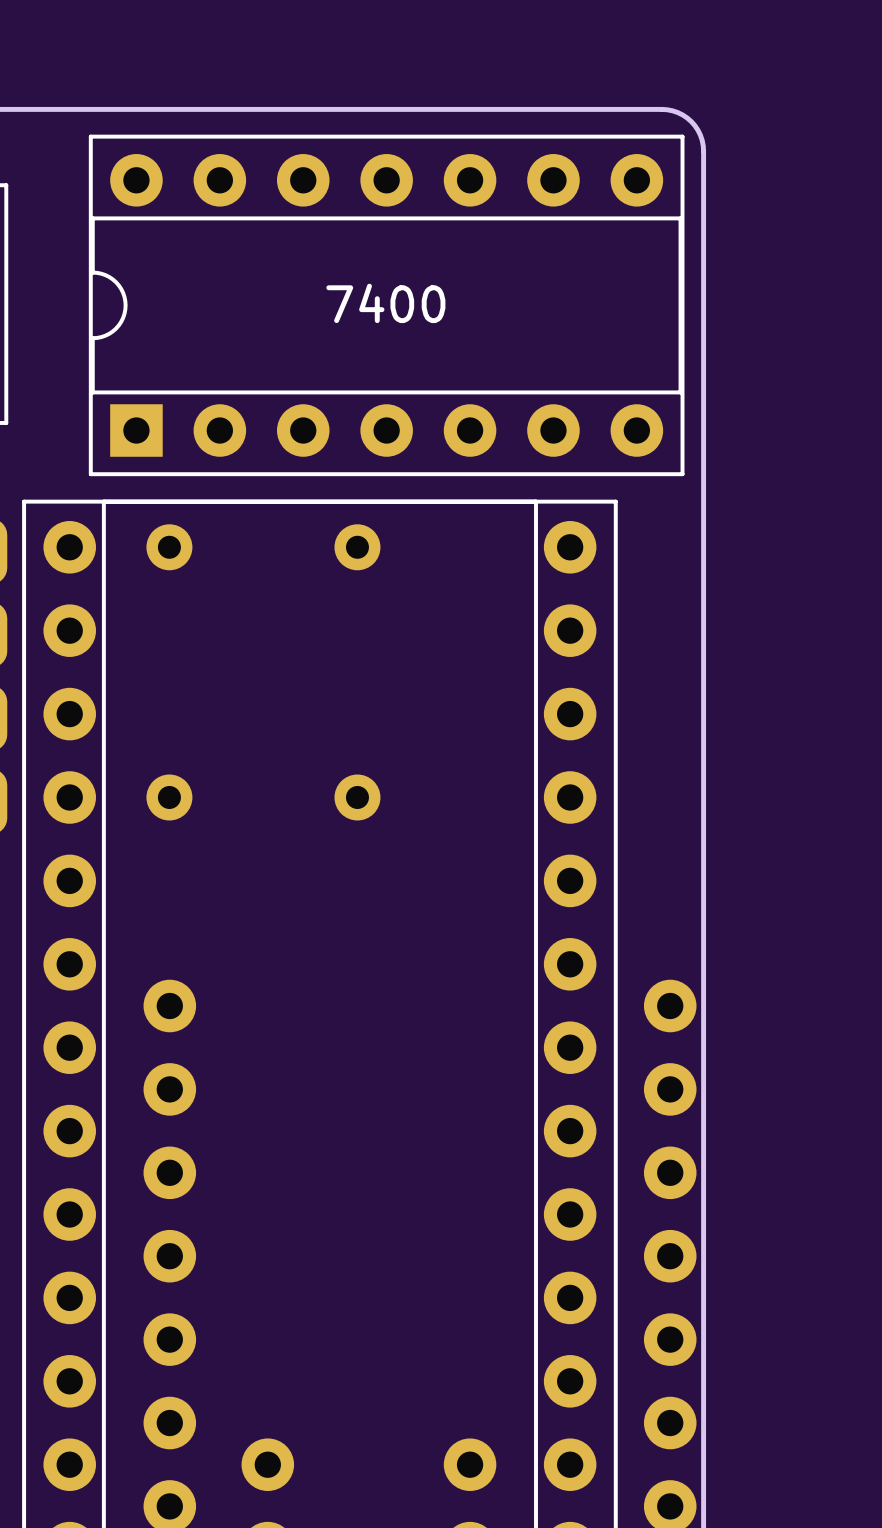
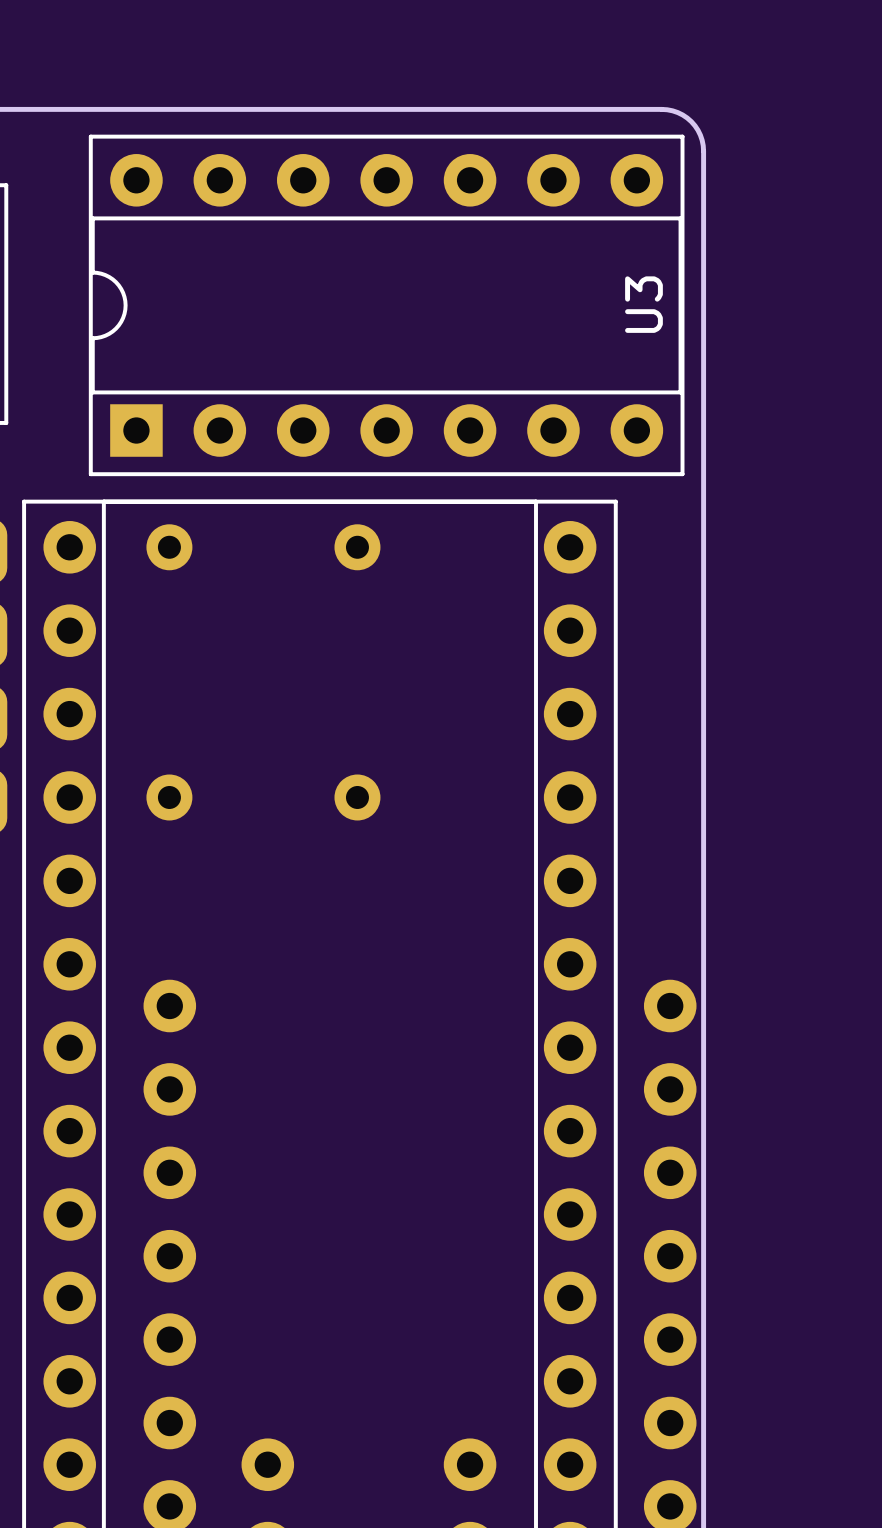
text: 7400 (385, 303) -> none
U3 name: none -> U3 (643, 304)

